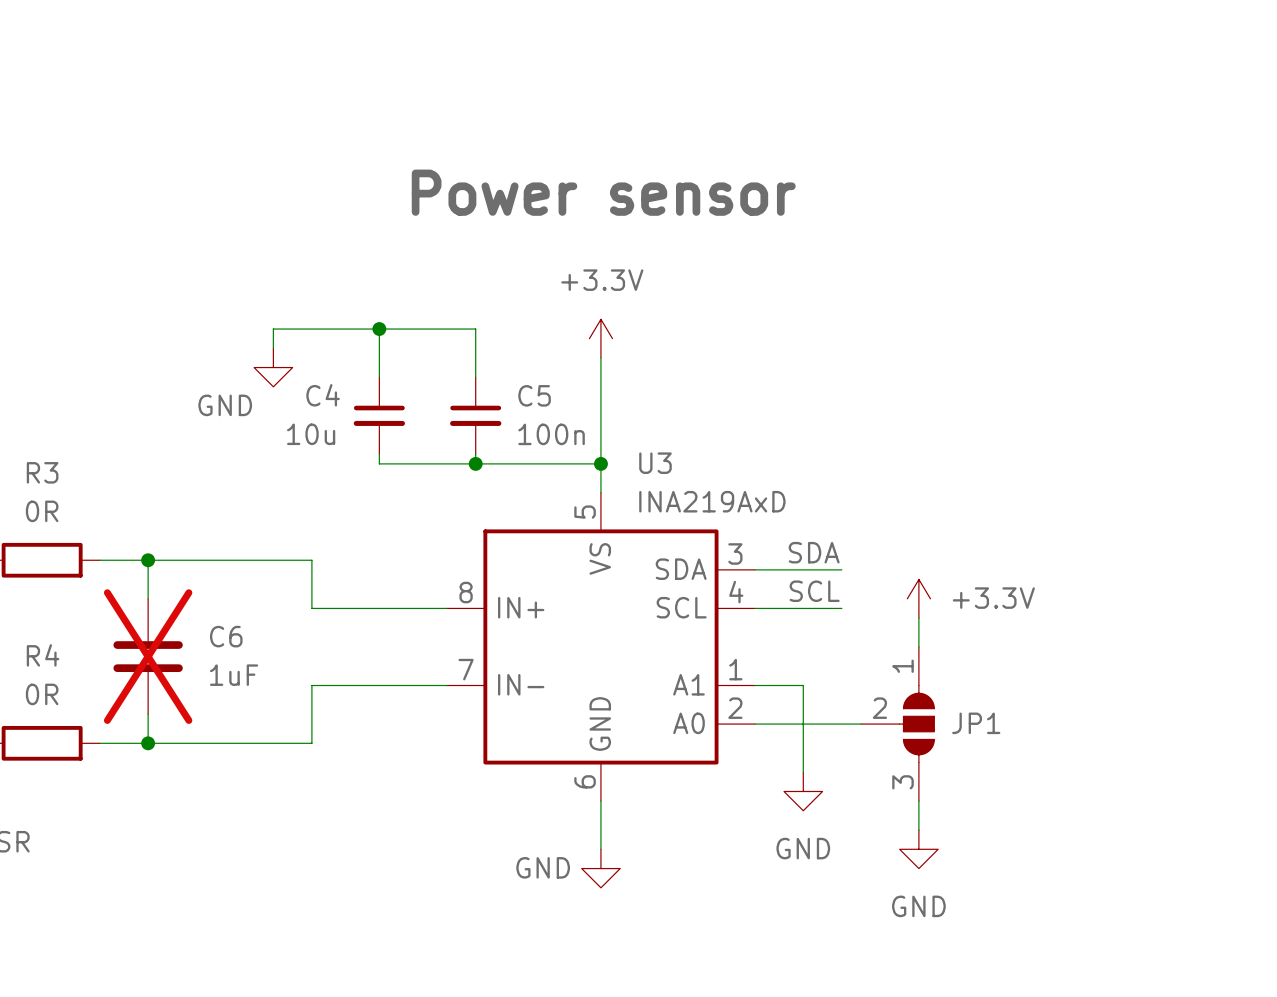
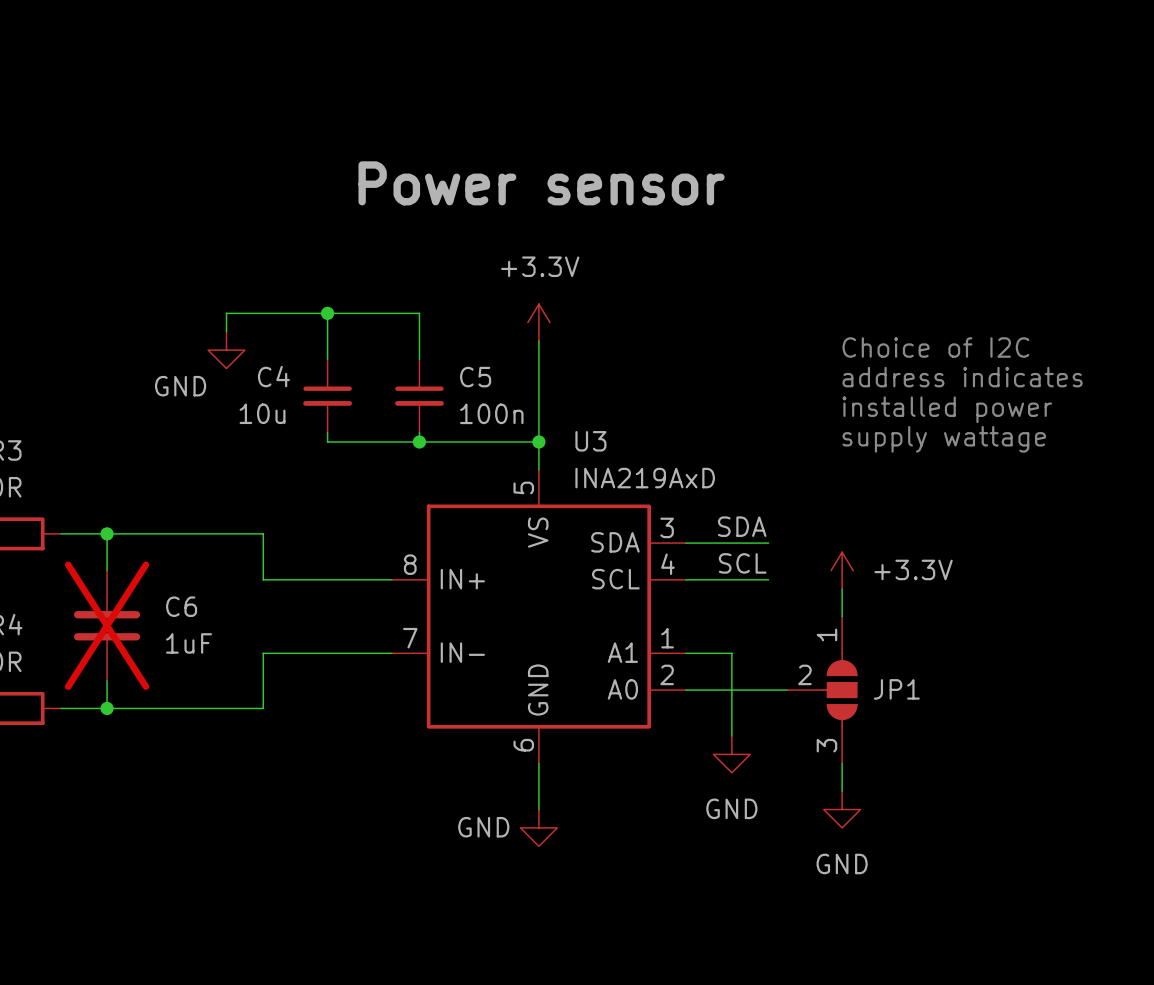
text: none -> Choice of I2C (935, 347)
text: none -> address indicates (962, 377)
text: none -> installed power (947, 409)
text: none -> supply wattage (944, 439)

